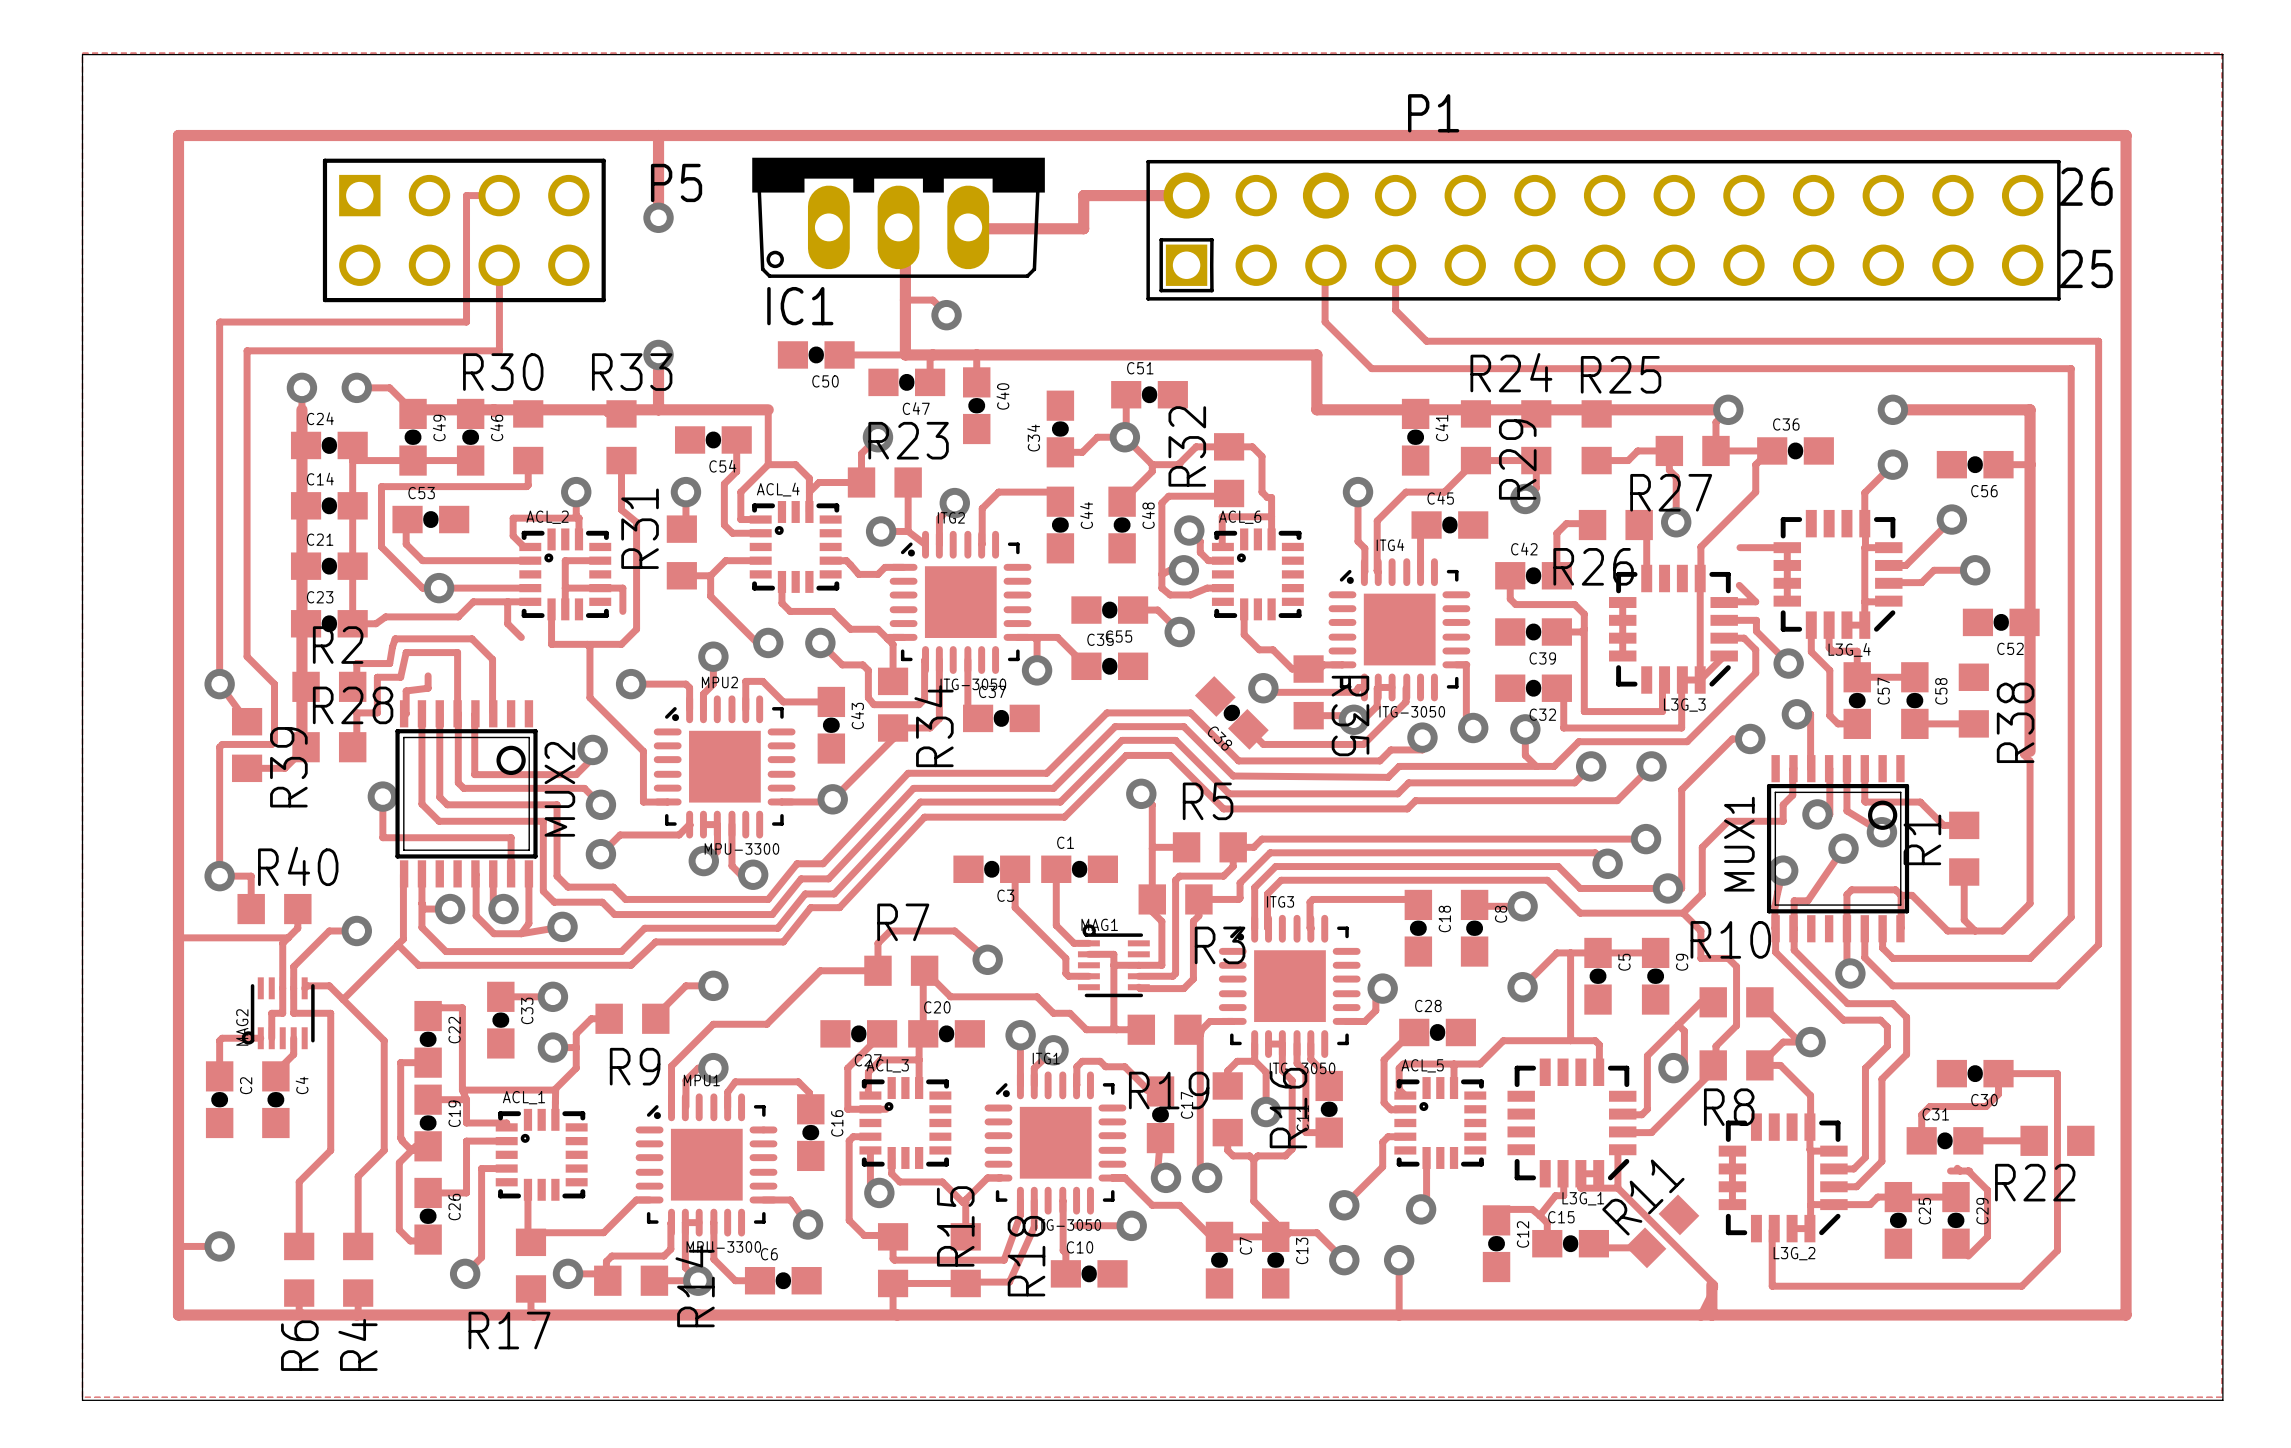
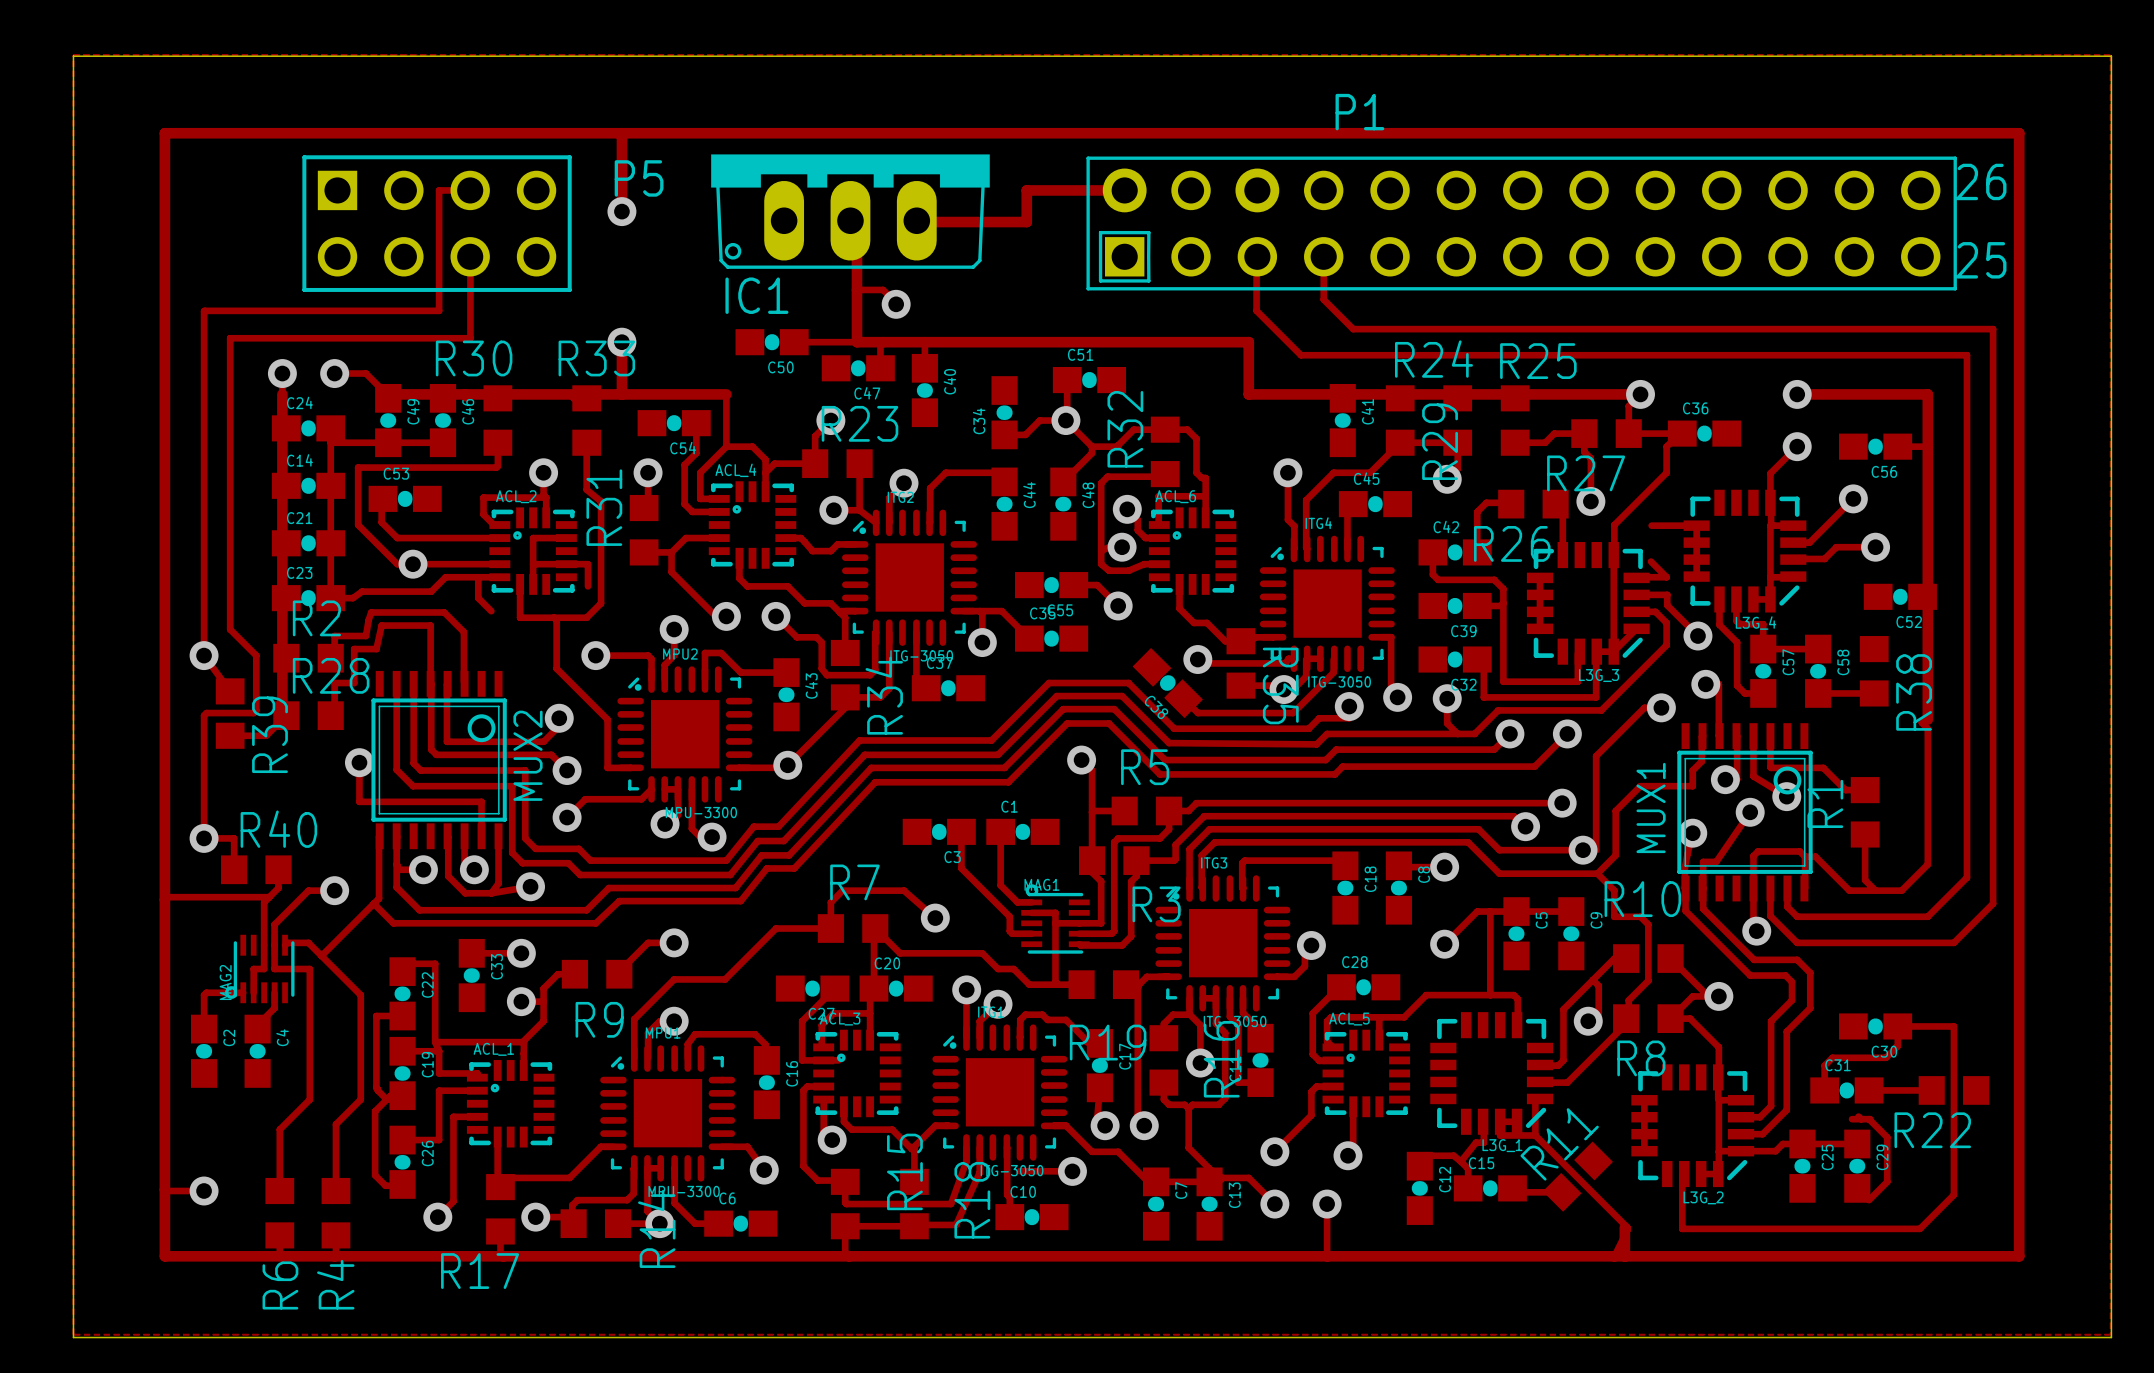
track: (428, 675) (428, 688) (406, 690) (406, 713) (404, 713) -> none

